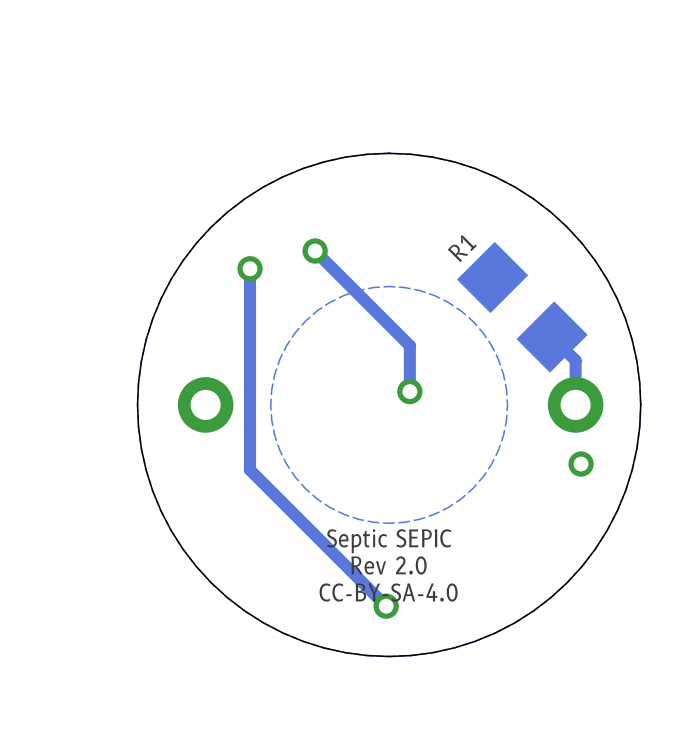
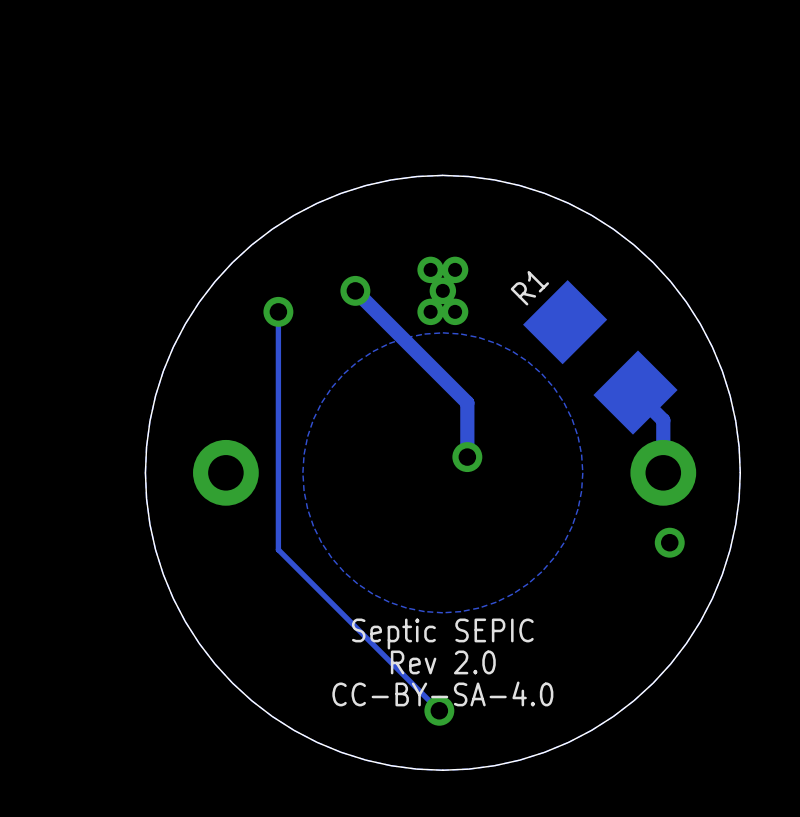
part: none -> (442, 290)
track width: thick (250, 268) (250, 470) (386, 606) -> thin (278, 311) (278, 549) (439, 710)

